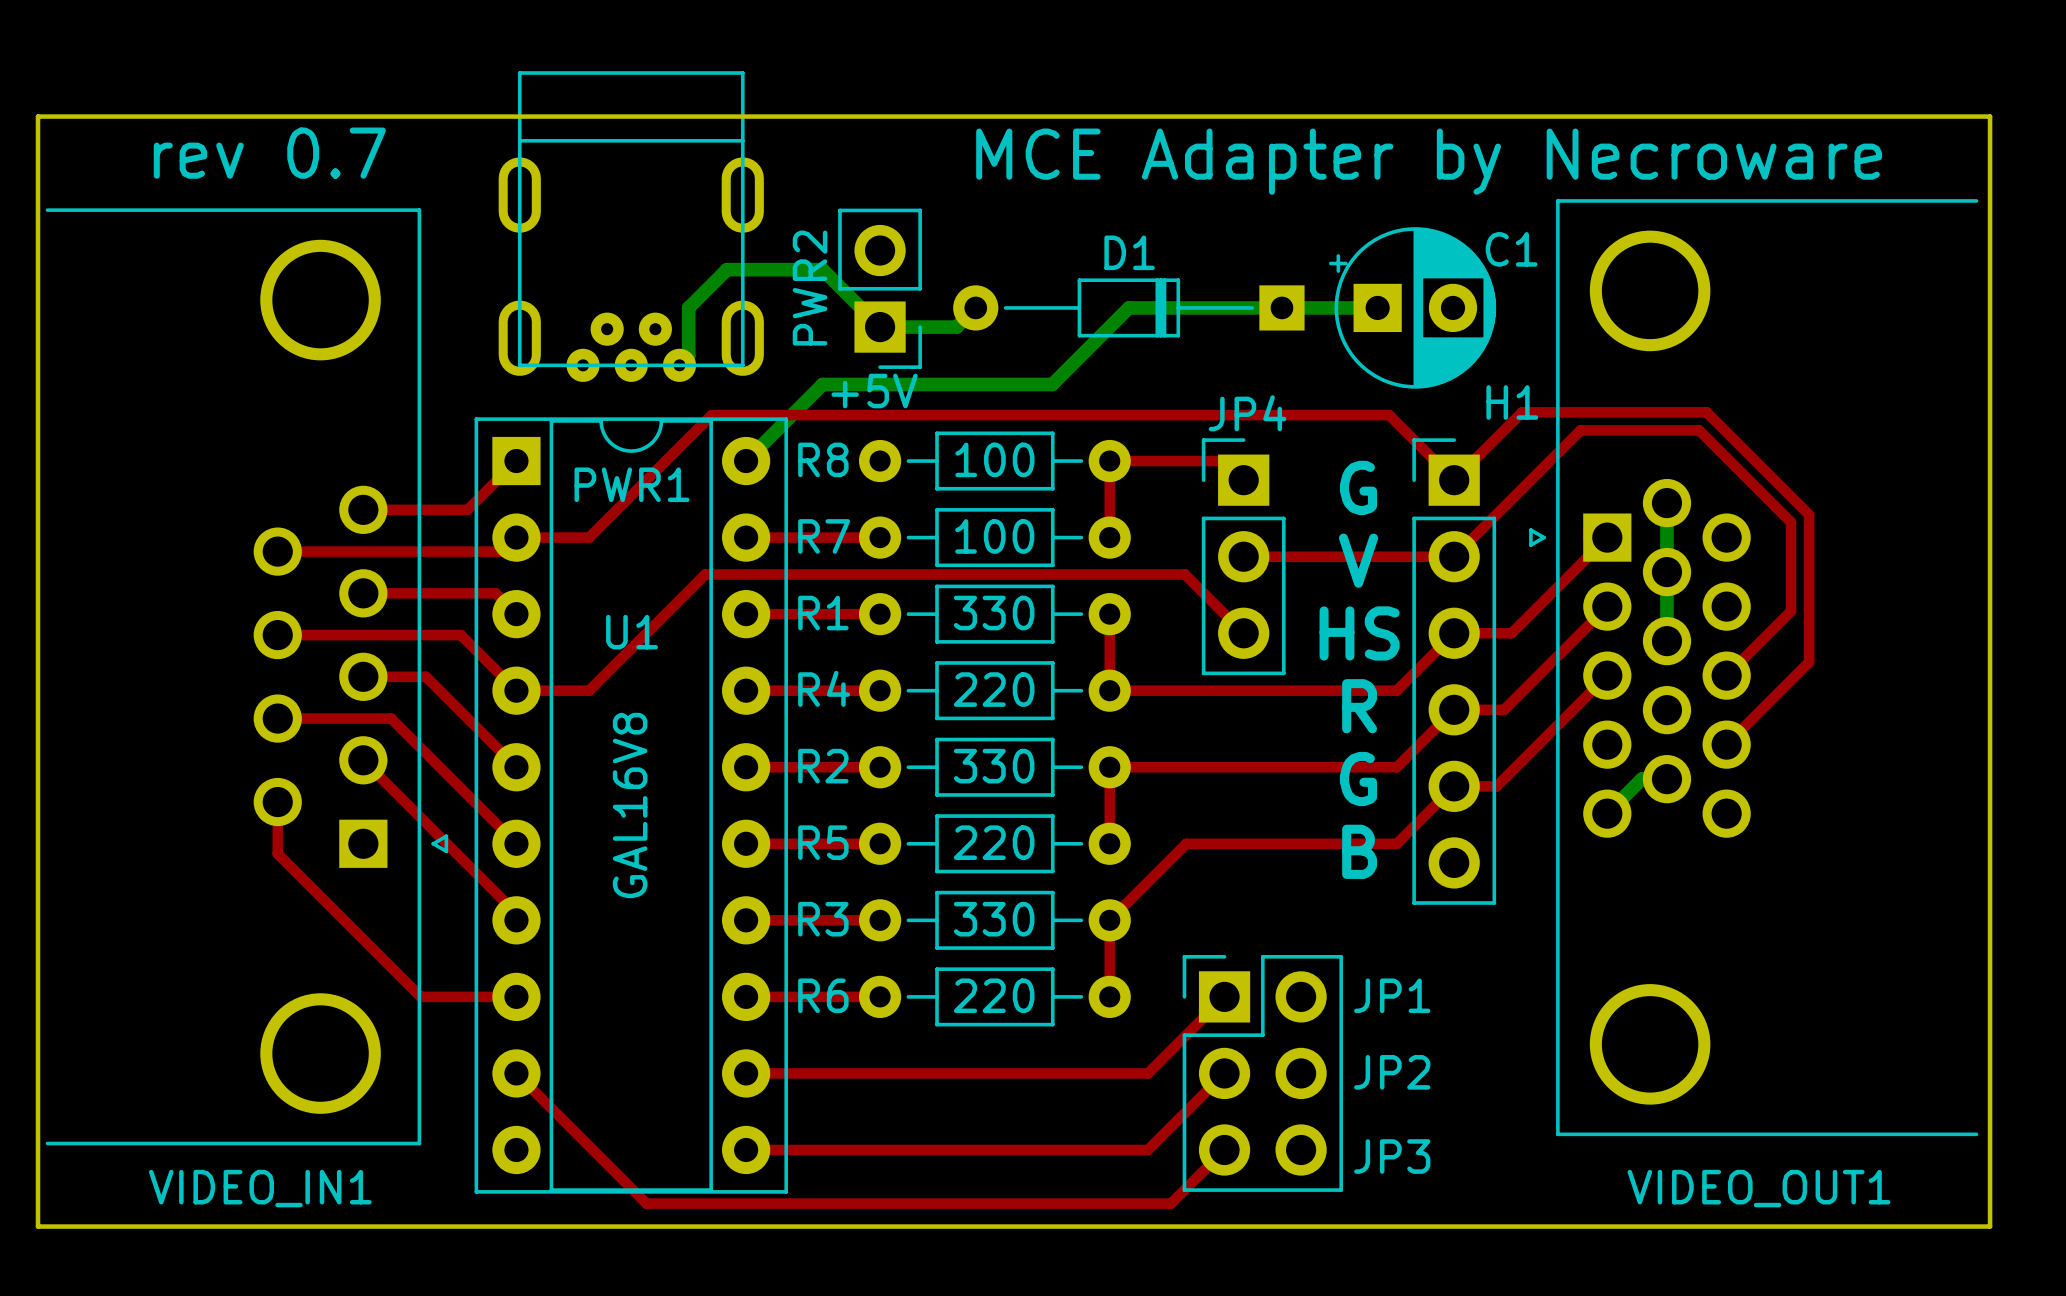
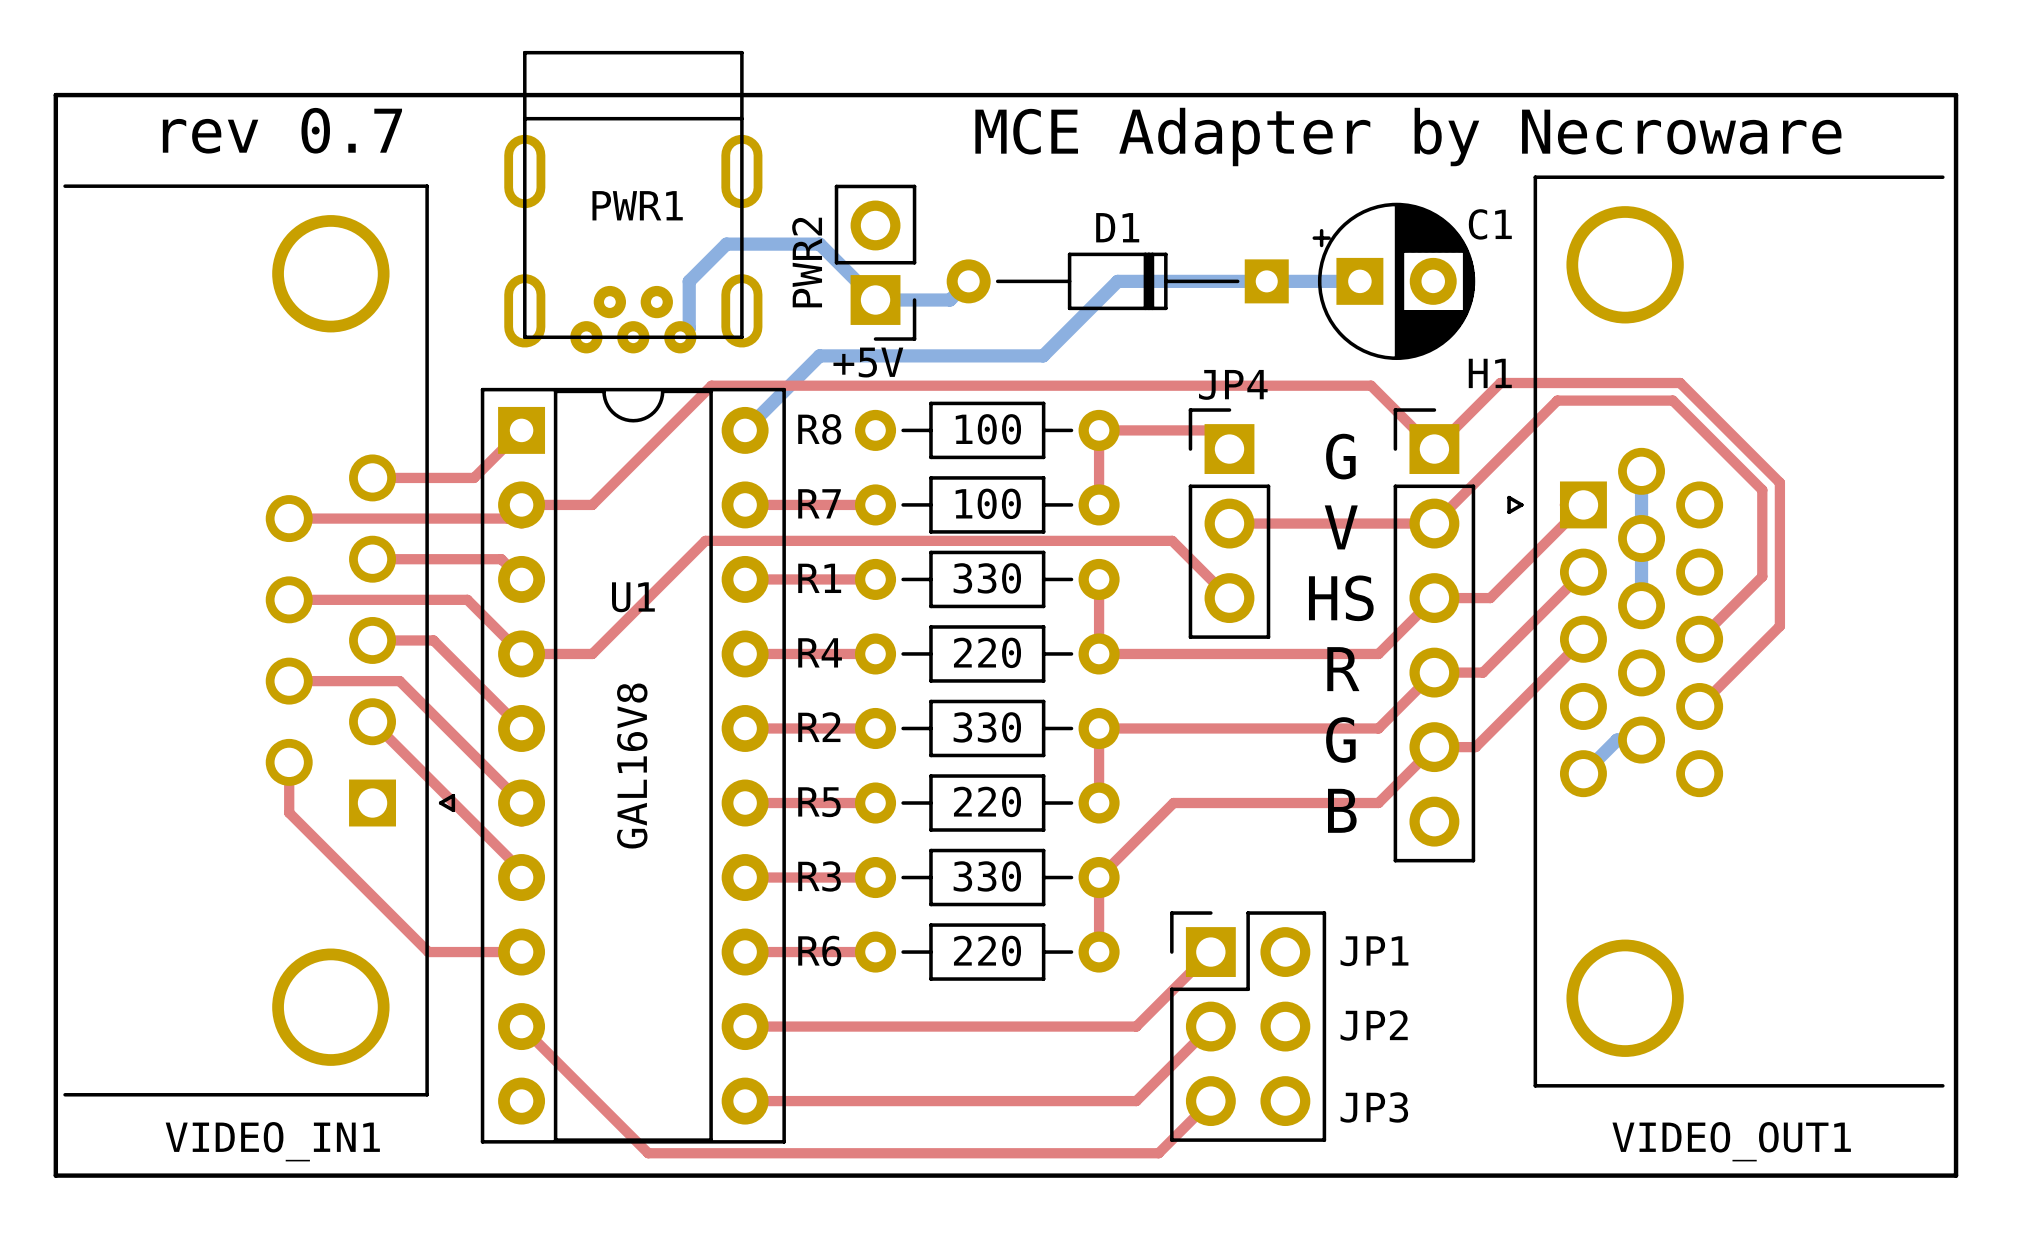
PWR1 name position: PWR1 (631, 484) -> PWR1 (637, 205)

